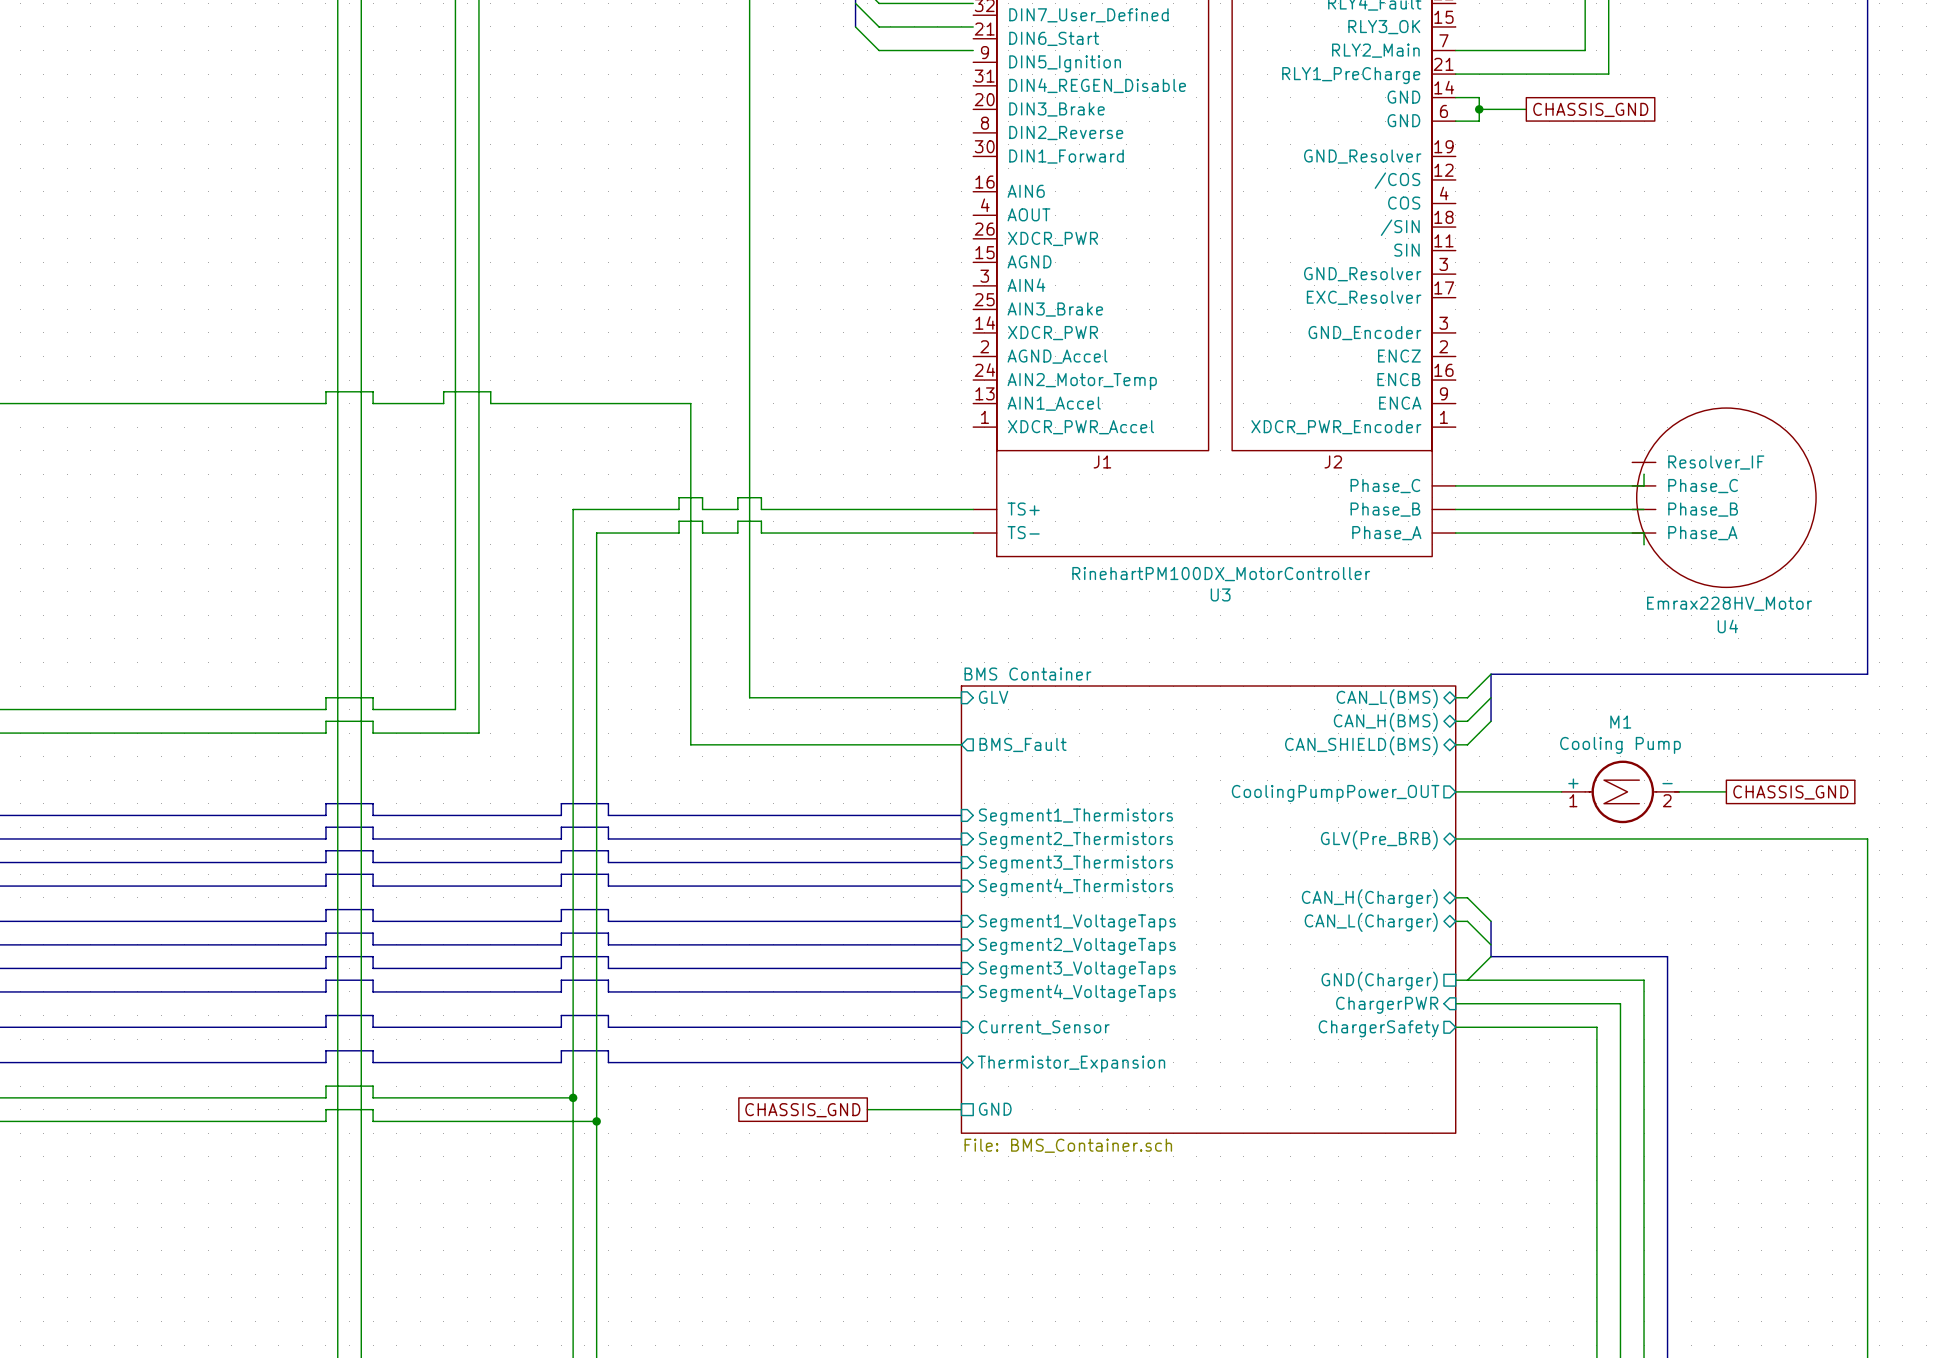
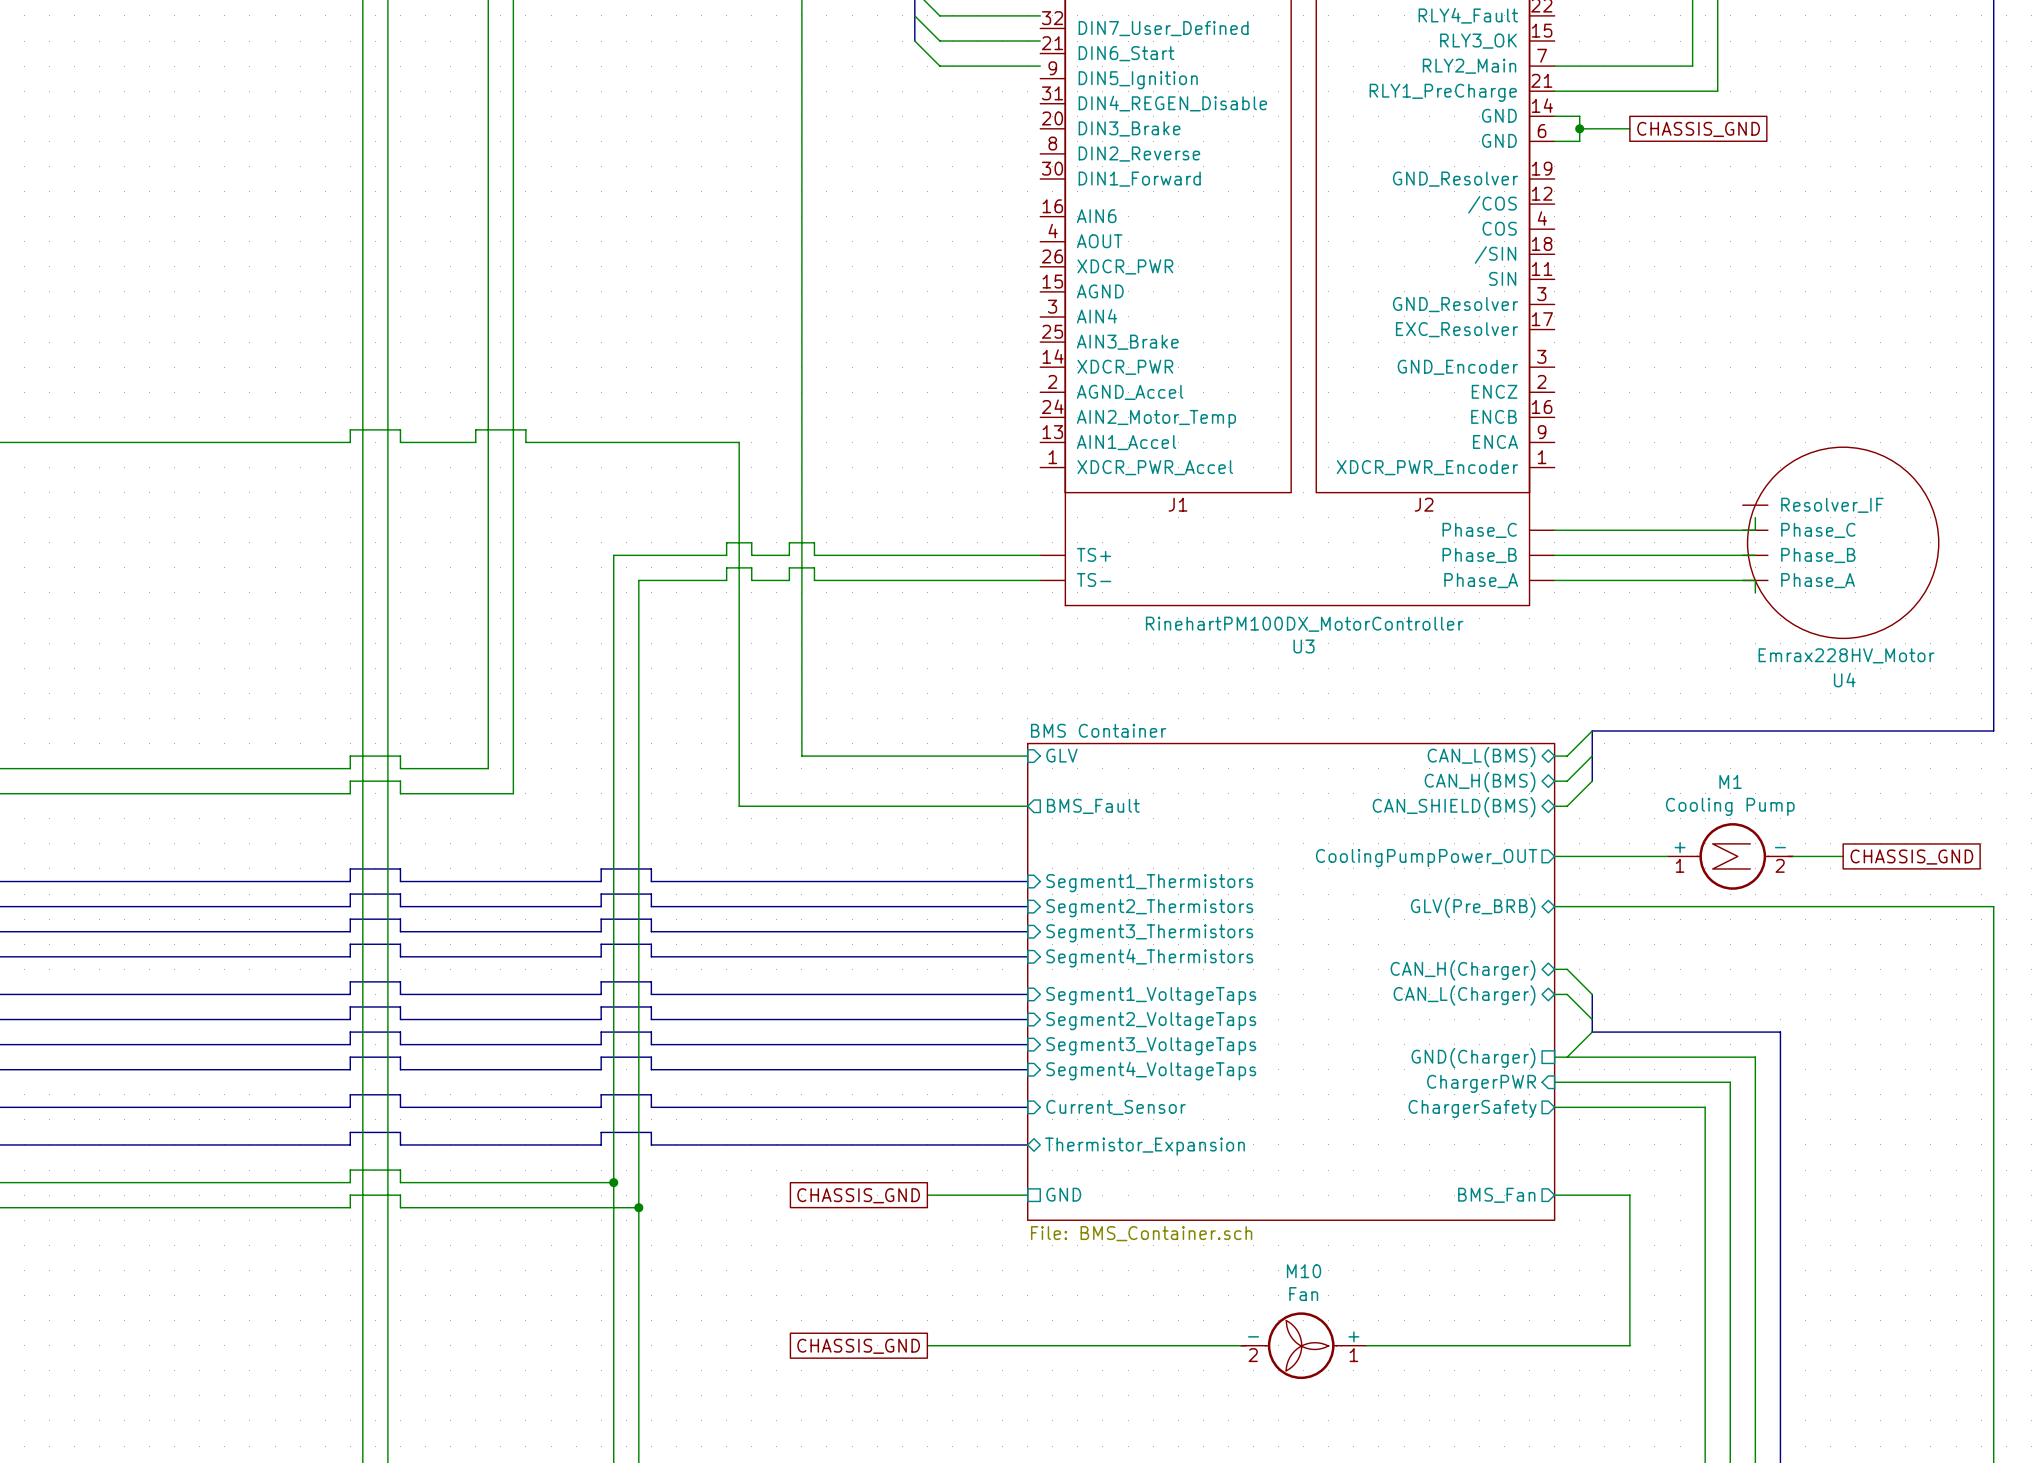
sheet pin: none -> BMS_Fan (1496, 1195)
wire: none -> (1554, 1195) (1629, 1195) (1629, 1345) (1366, 1345)
wire: none -> (927, 1345) (1240, 1345)
M10: none -> Fan (1303, 1345)
global label: none -> CHASSIS_GND (858, 1346)

